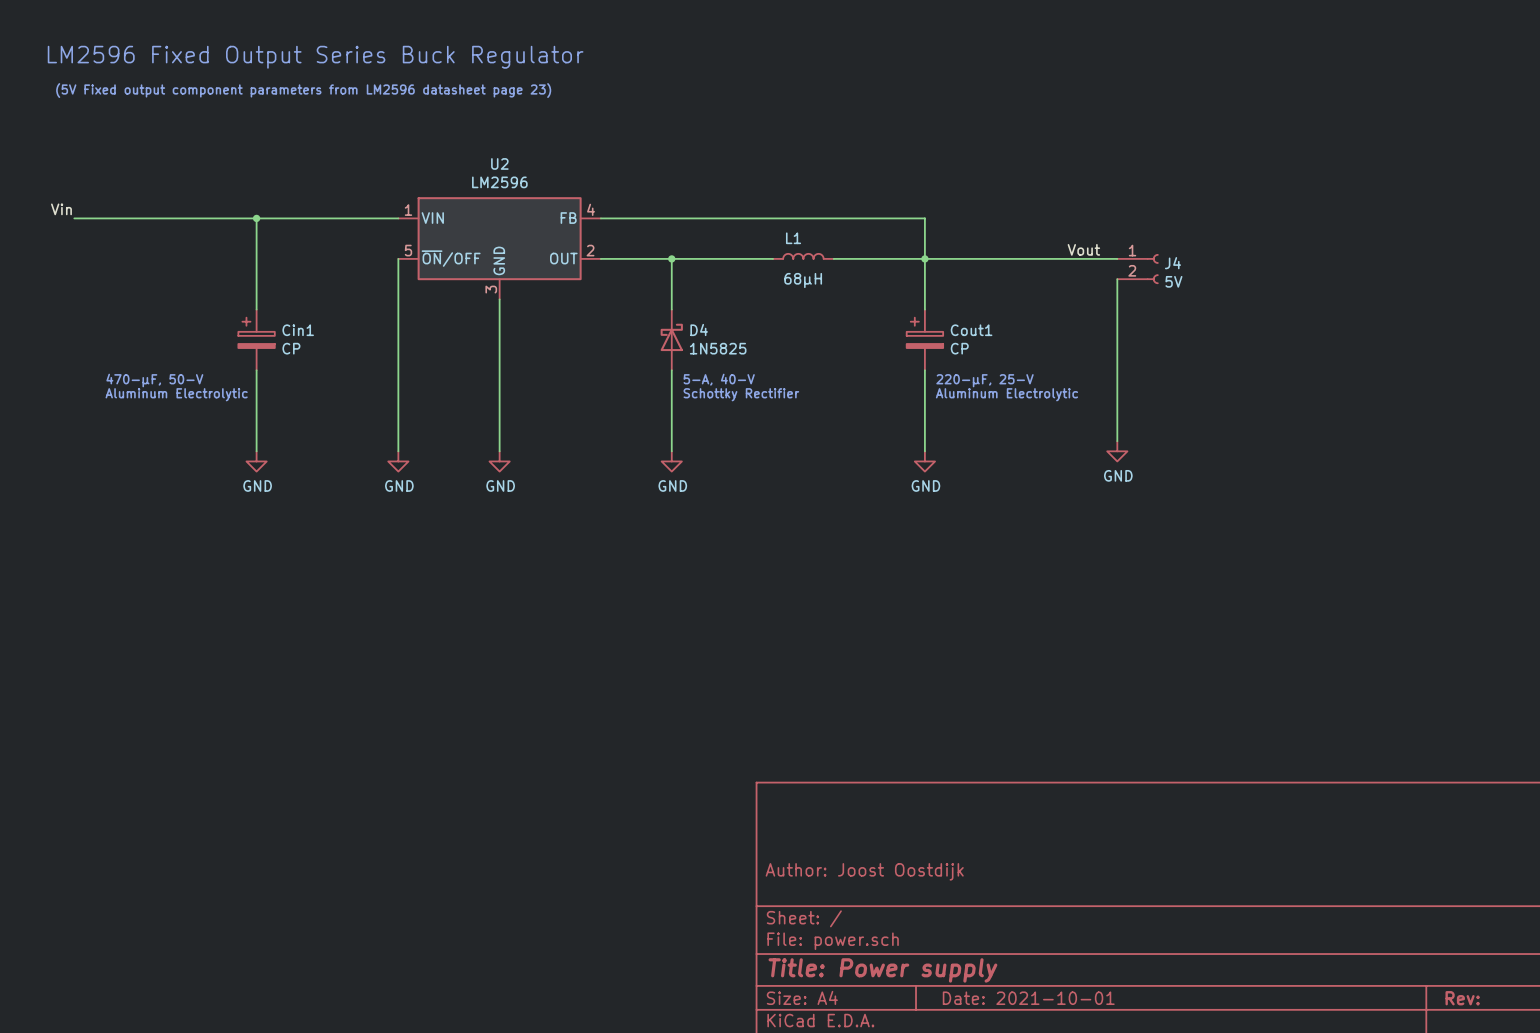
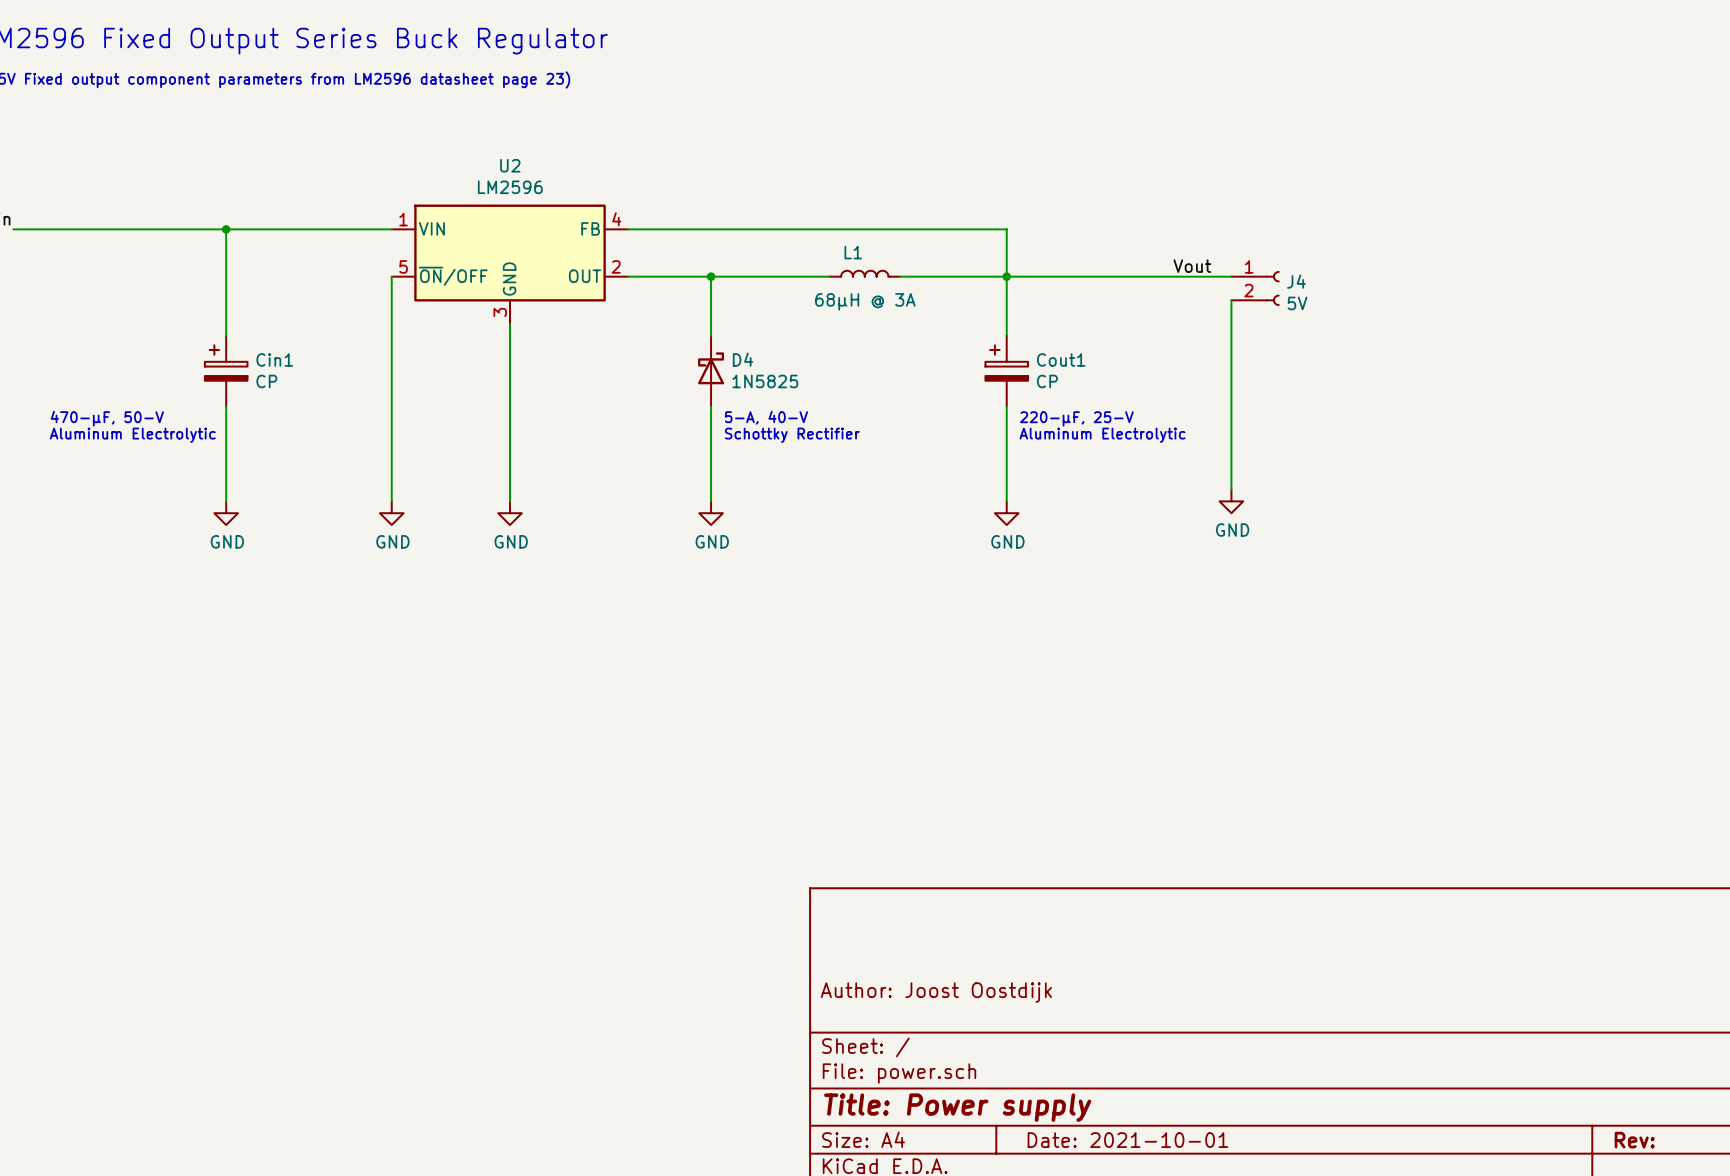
L1 value: 68μH (803, 280) -> 68μH @ 3A (865, 301)

